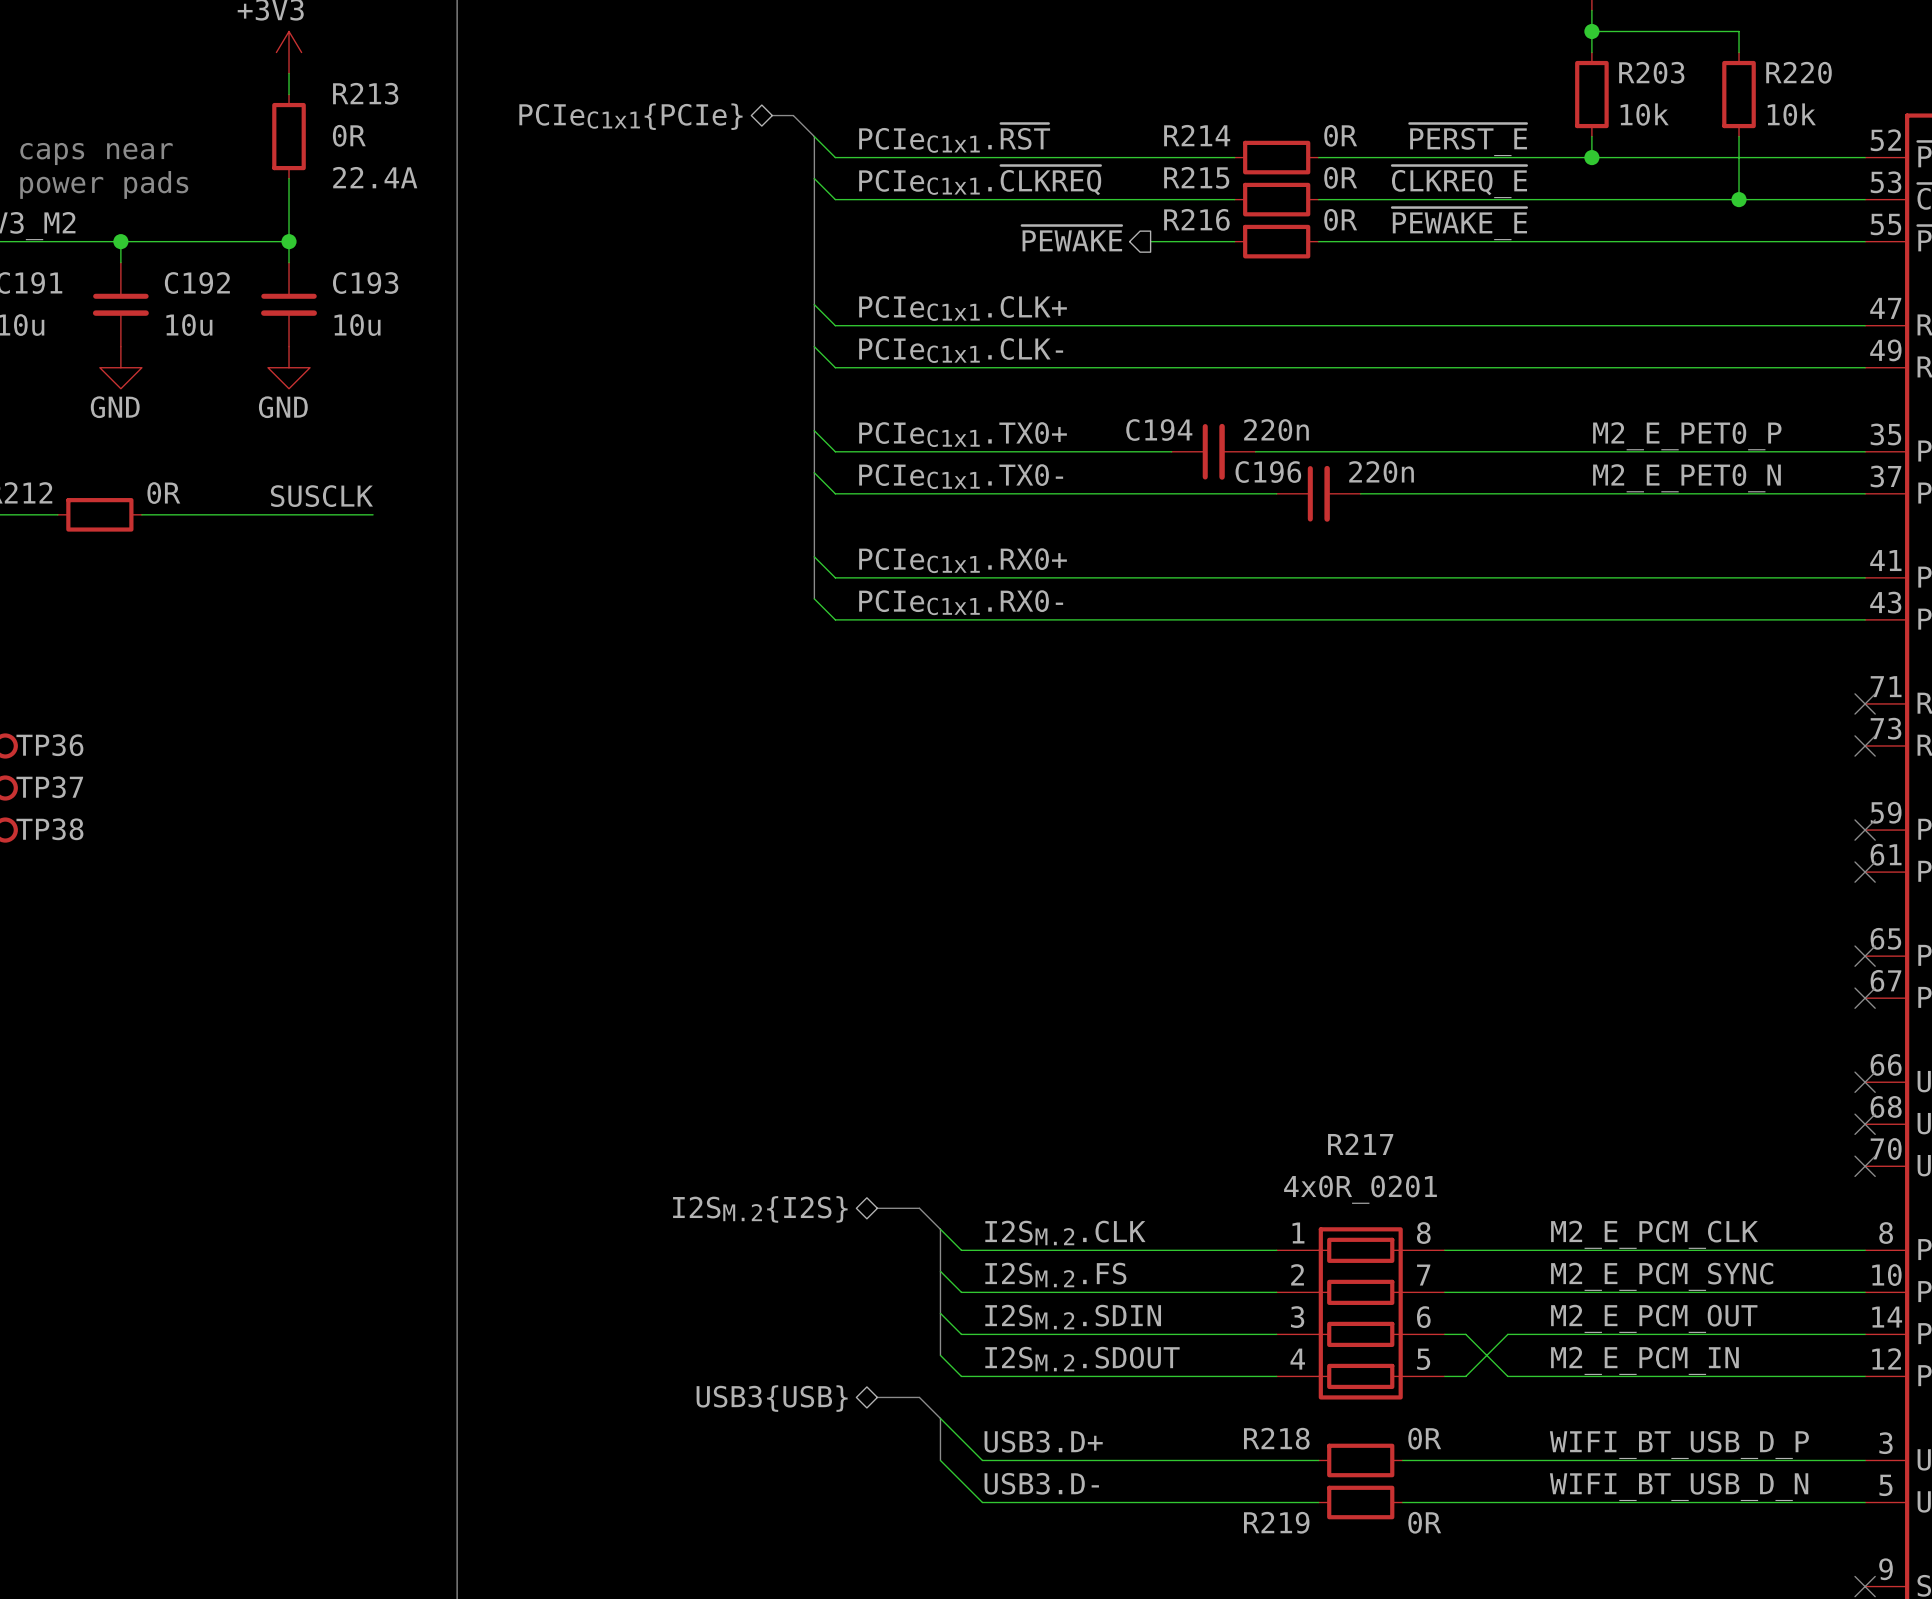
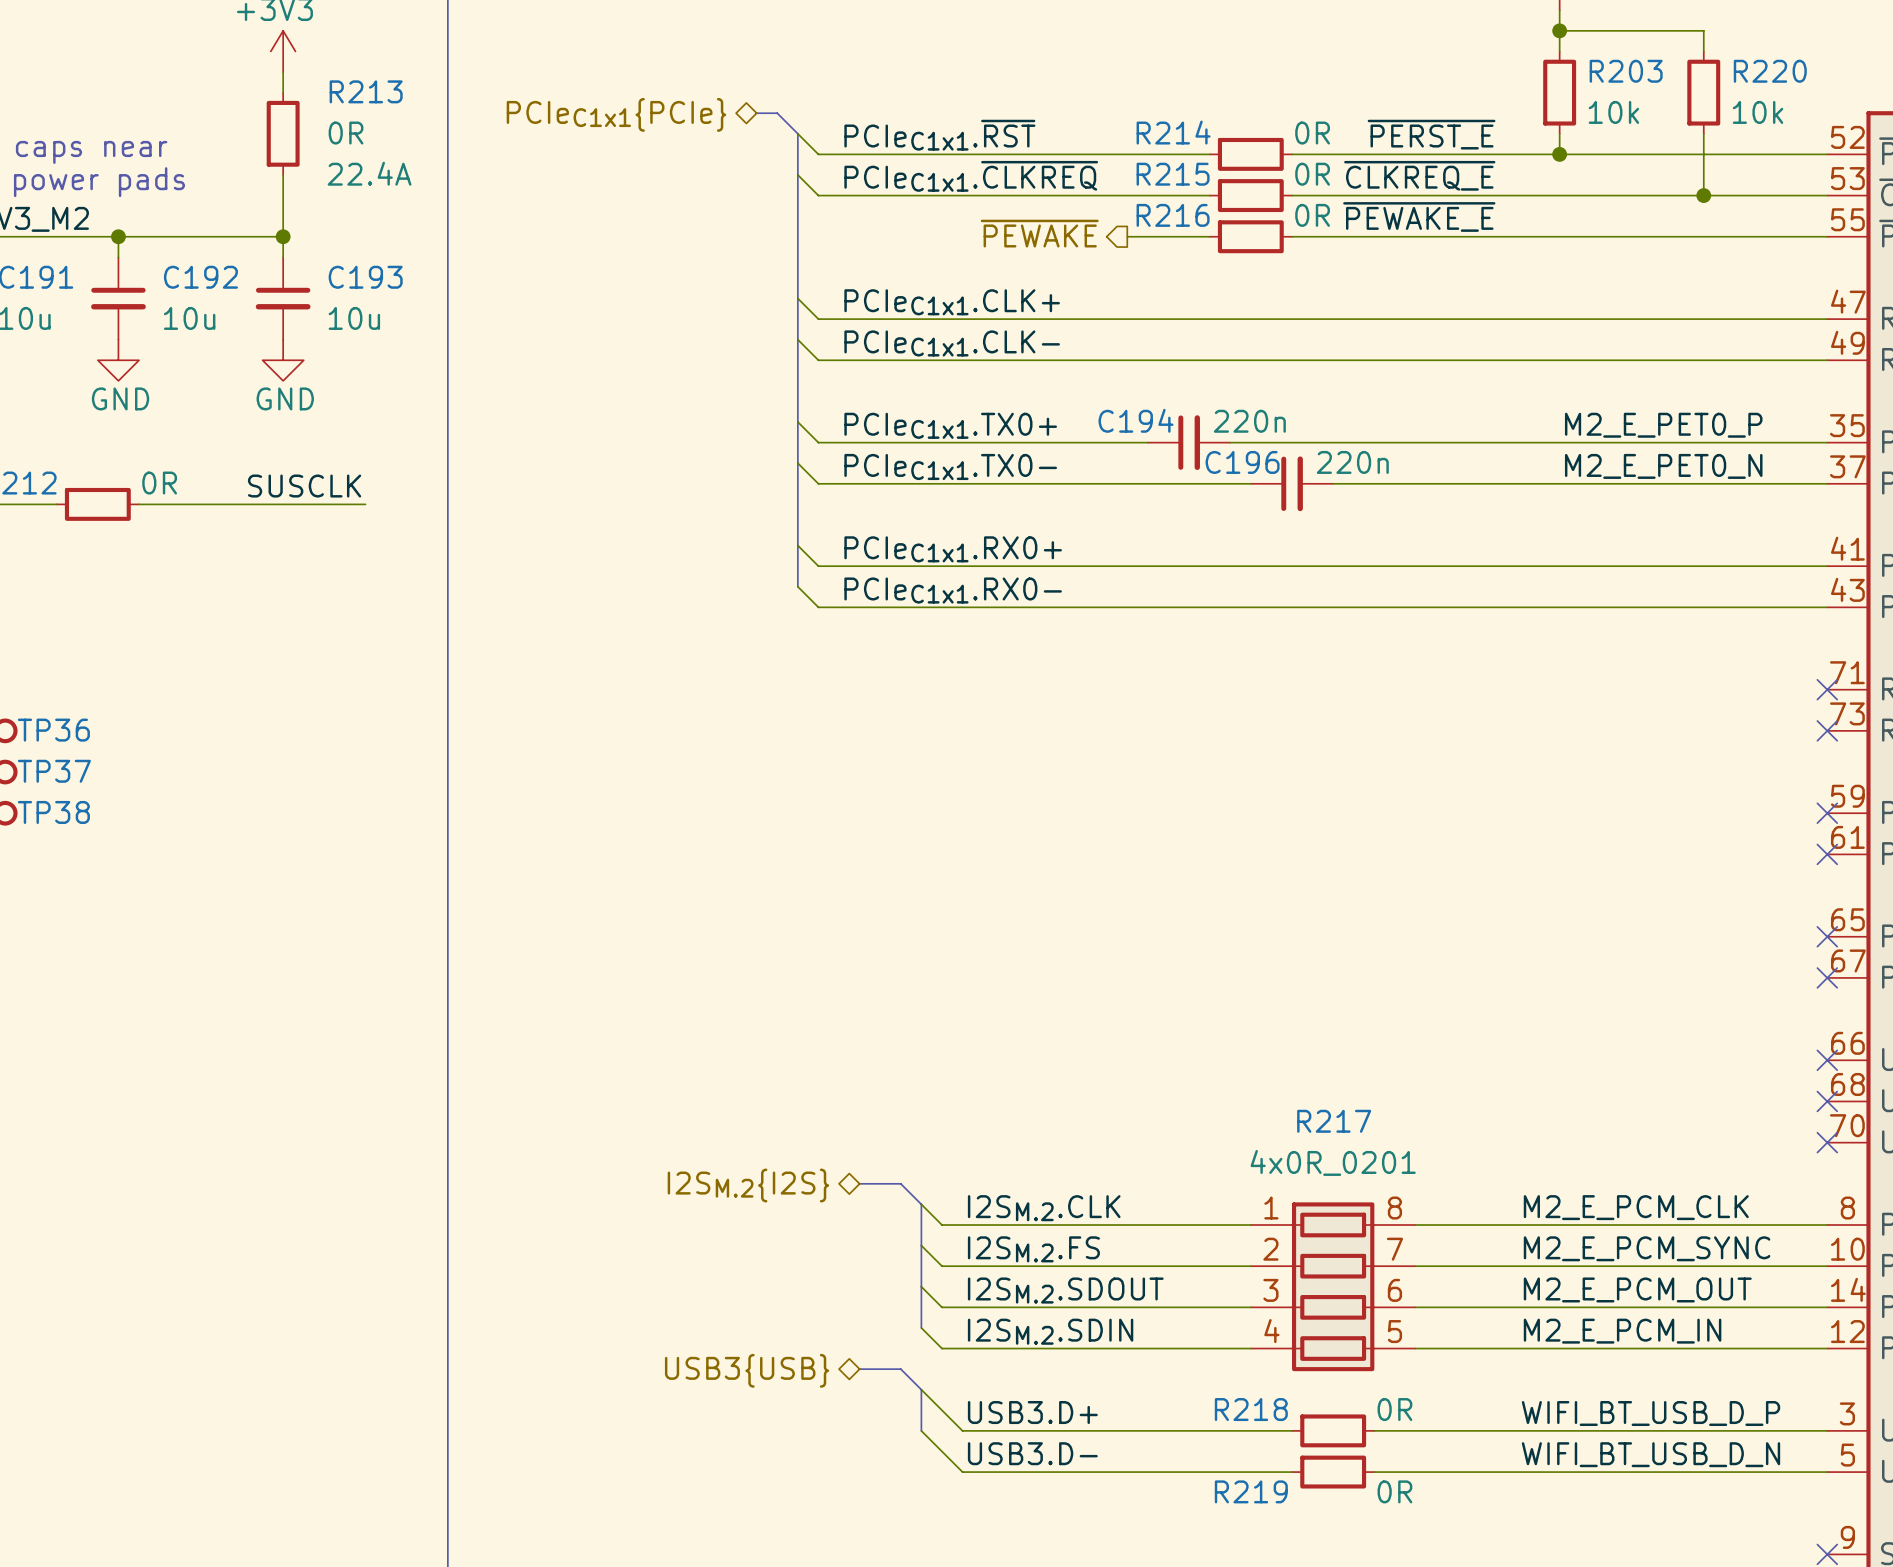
label: I2SM.2.SDIN (1073, 1317) -> I2SM.2.SDOUT (1065, 1290)
wire: (1465, 1334) (1507, 1376) -> (1436, 1307) (1477, 1307)
wire: (1507, 1334) (1465, 1376) -> (1477, 1348) (1436, 1348)
label: I2SM.2.SDOUT (1082, 1359) -> I2SM.2.SDIN (1050, 1331)

